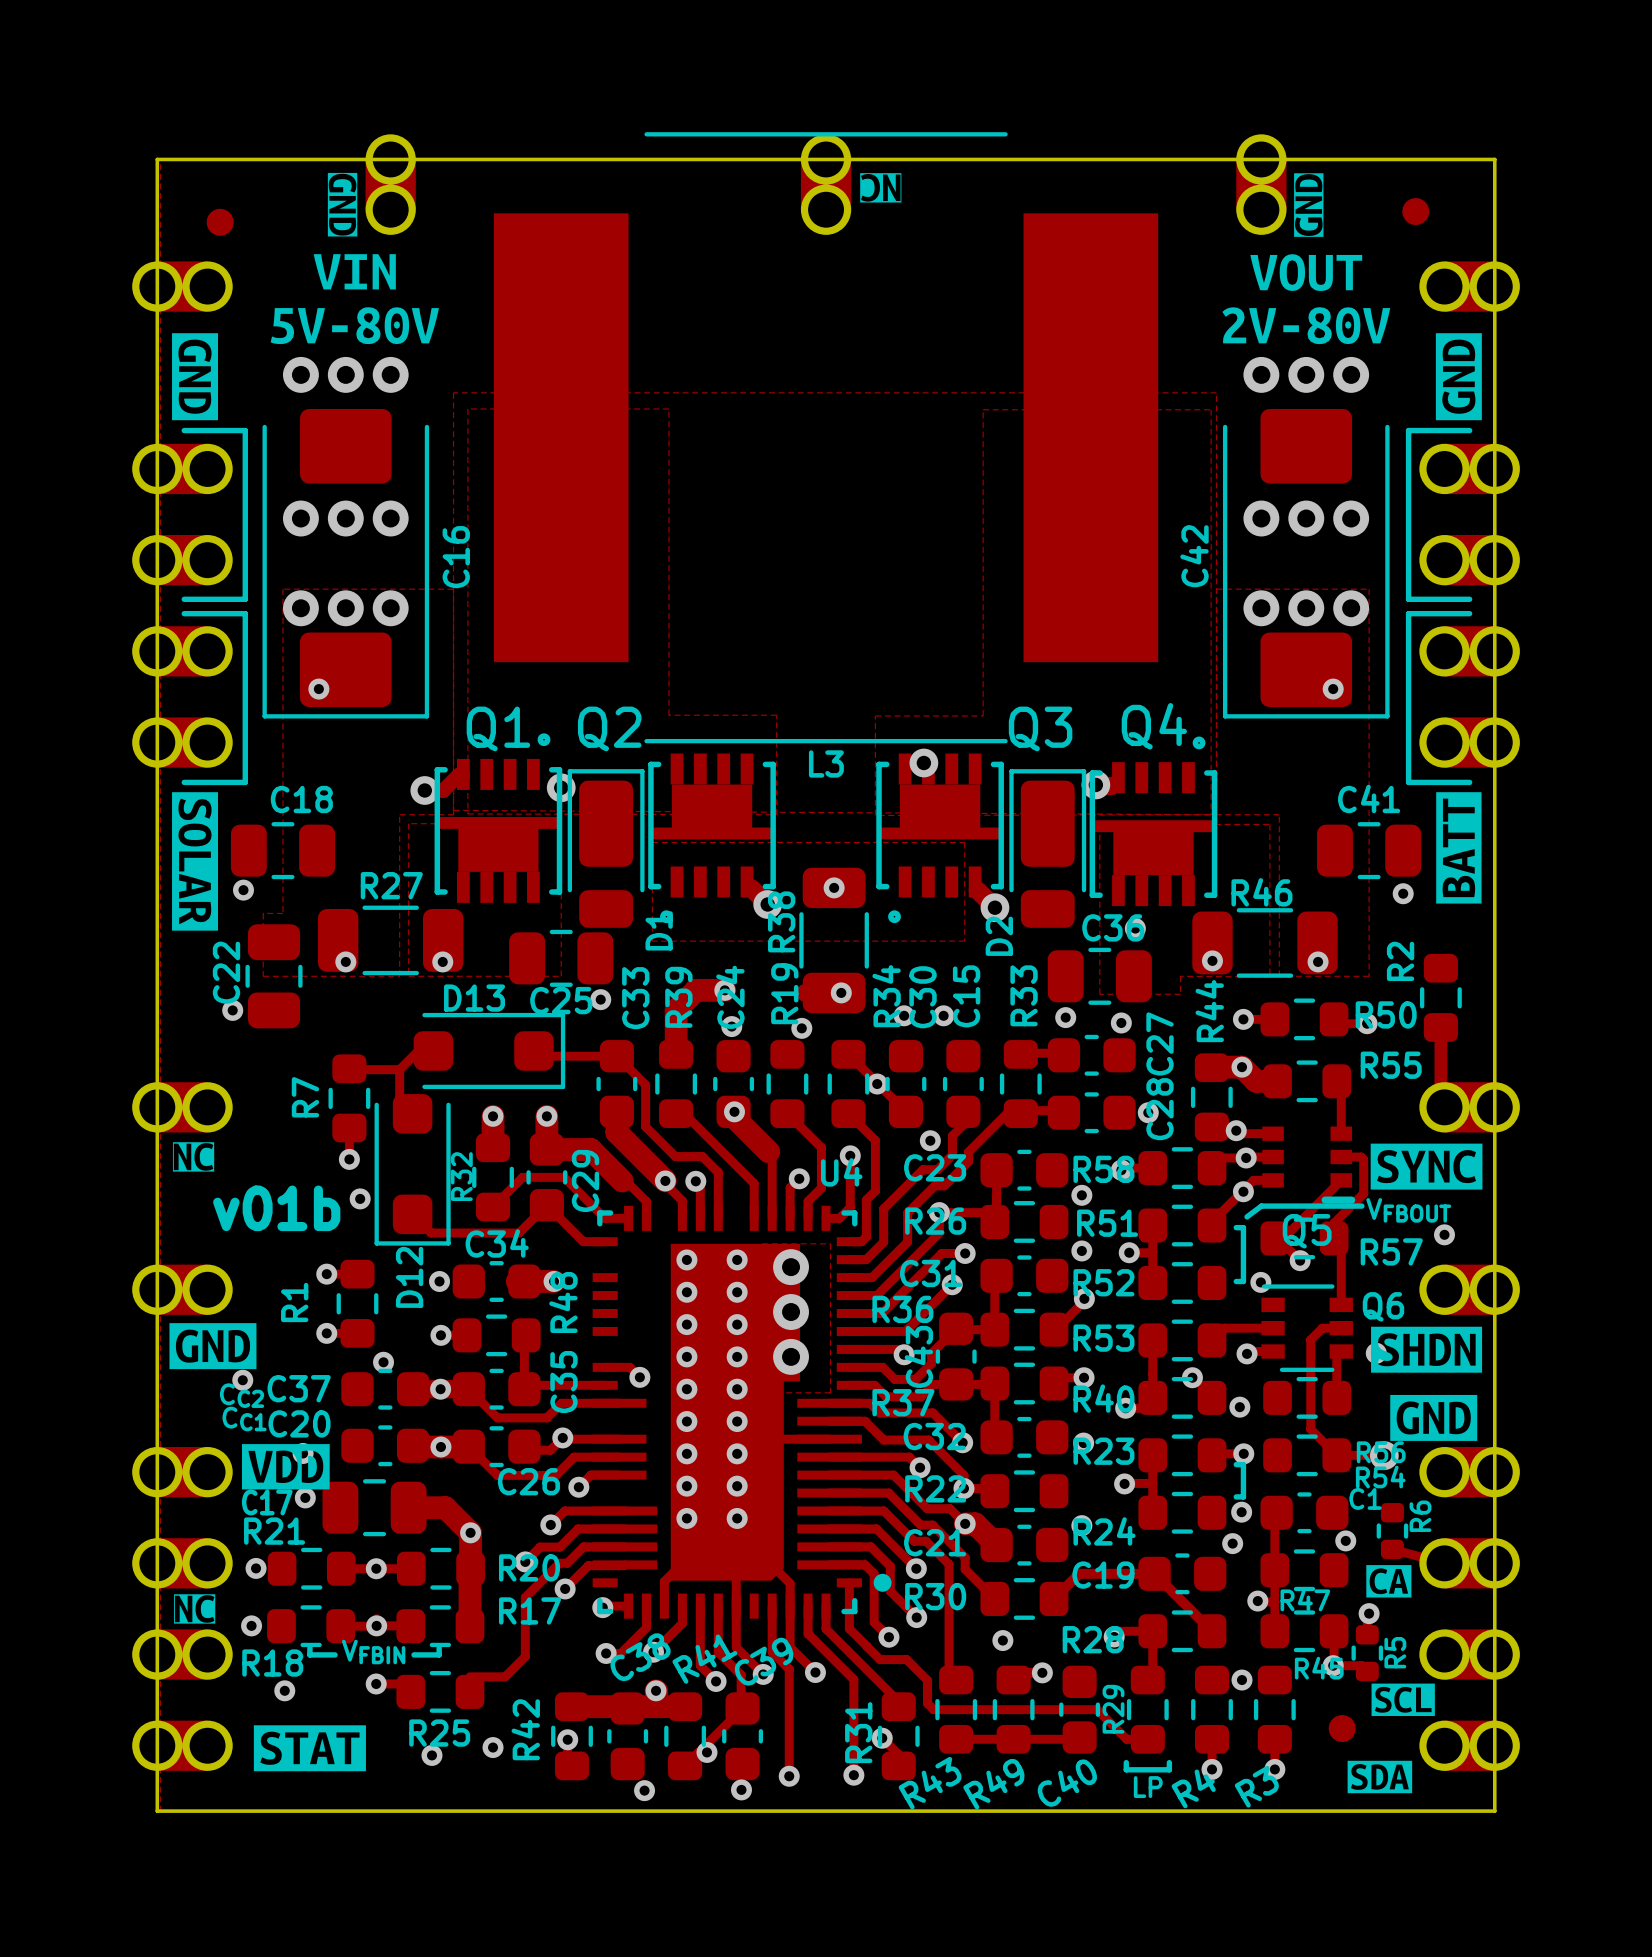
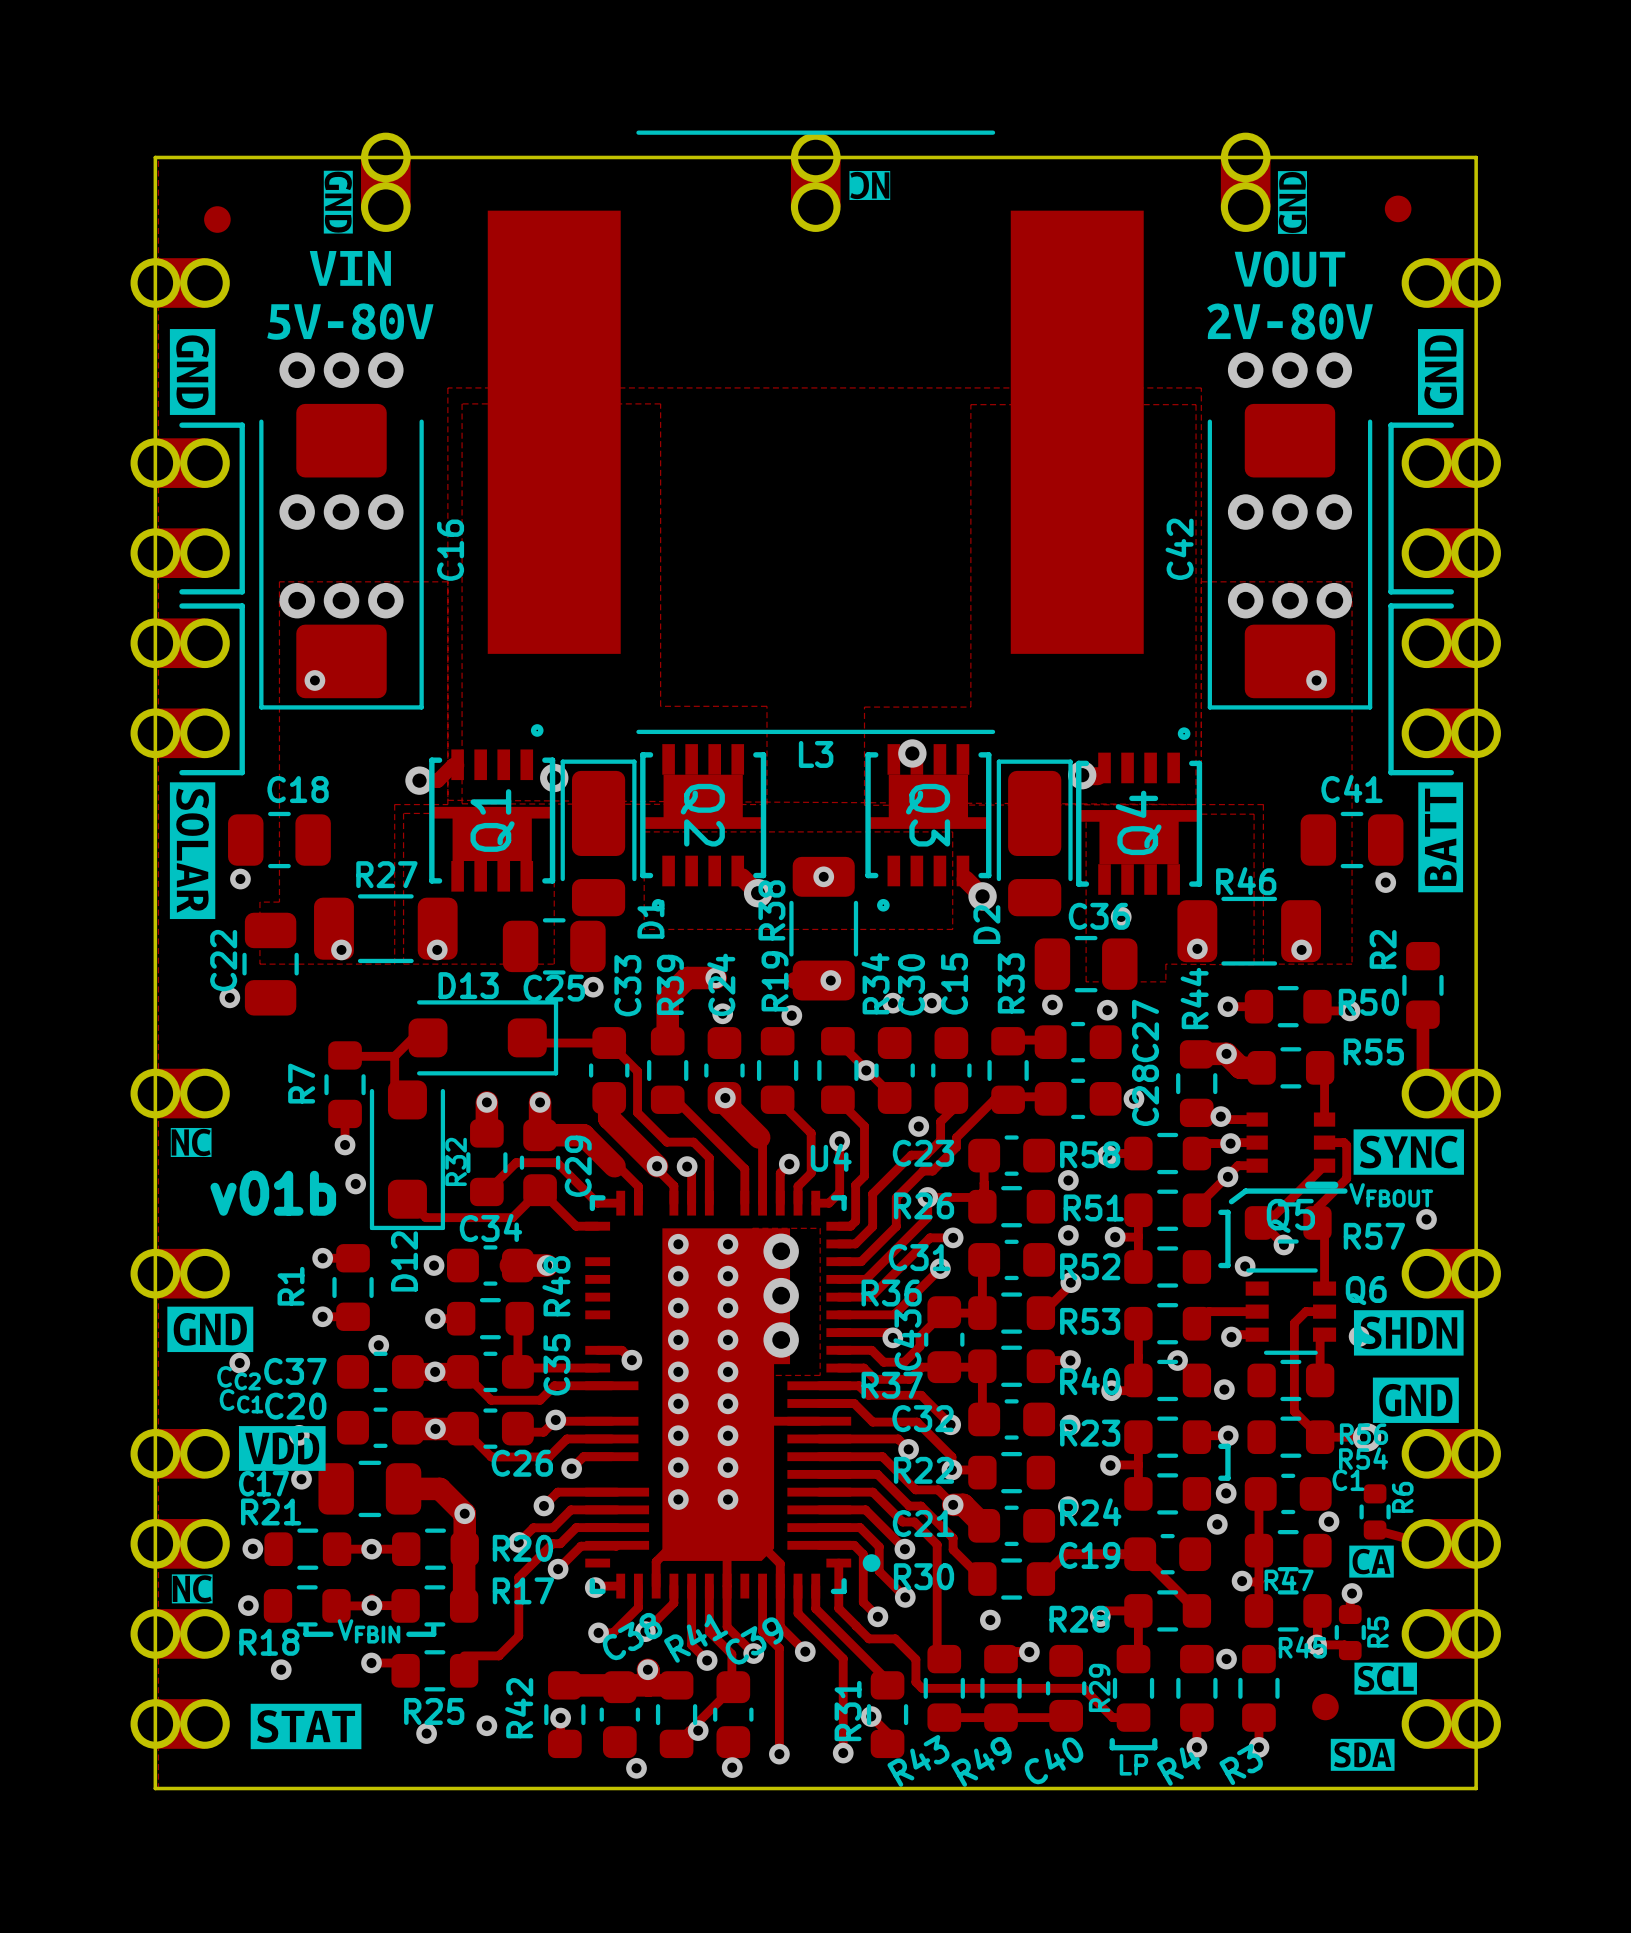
Q4 name rotation: 0° (1154, 726) -> 90° counterclockwise (1138, 822)
Q4 name position: Q4 (1154, 726) -> Q4 (1138, 822)
Q1 name rotation: 0° (498, 728) -> 90° counterclockwise (492, 820)
Q1 name position: Q1 (498, 728) -> Q1 (492, 820)
Q2 name rotation: 0° (609, 728) -> 90° clockwise (702, 815)
Q2 name position: Q2 (609, 728) -> Q2 (702, 815)
Q3 name rotation: 0° (1040, 728) -> 90° clockwise (928, 815)
Q3 name position: Q3 (1040, 728) -> Q3 (928, 815)

